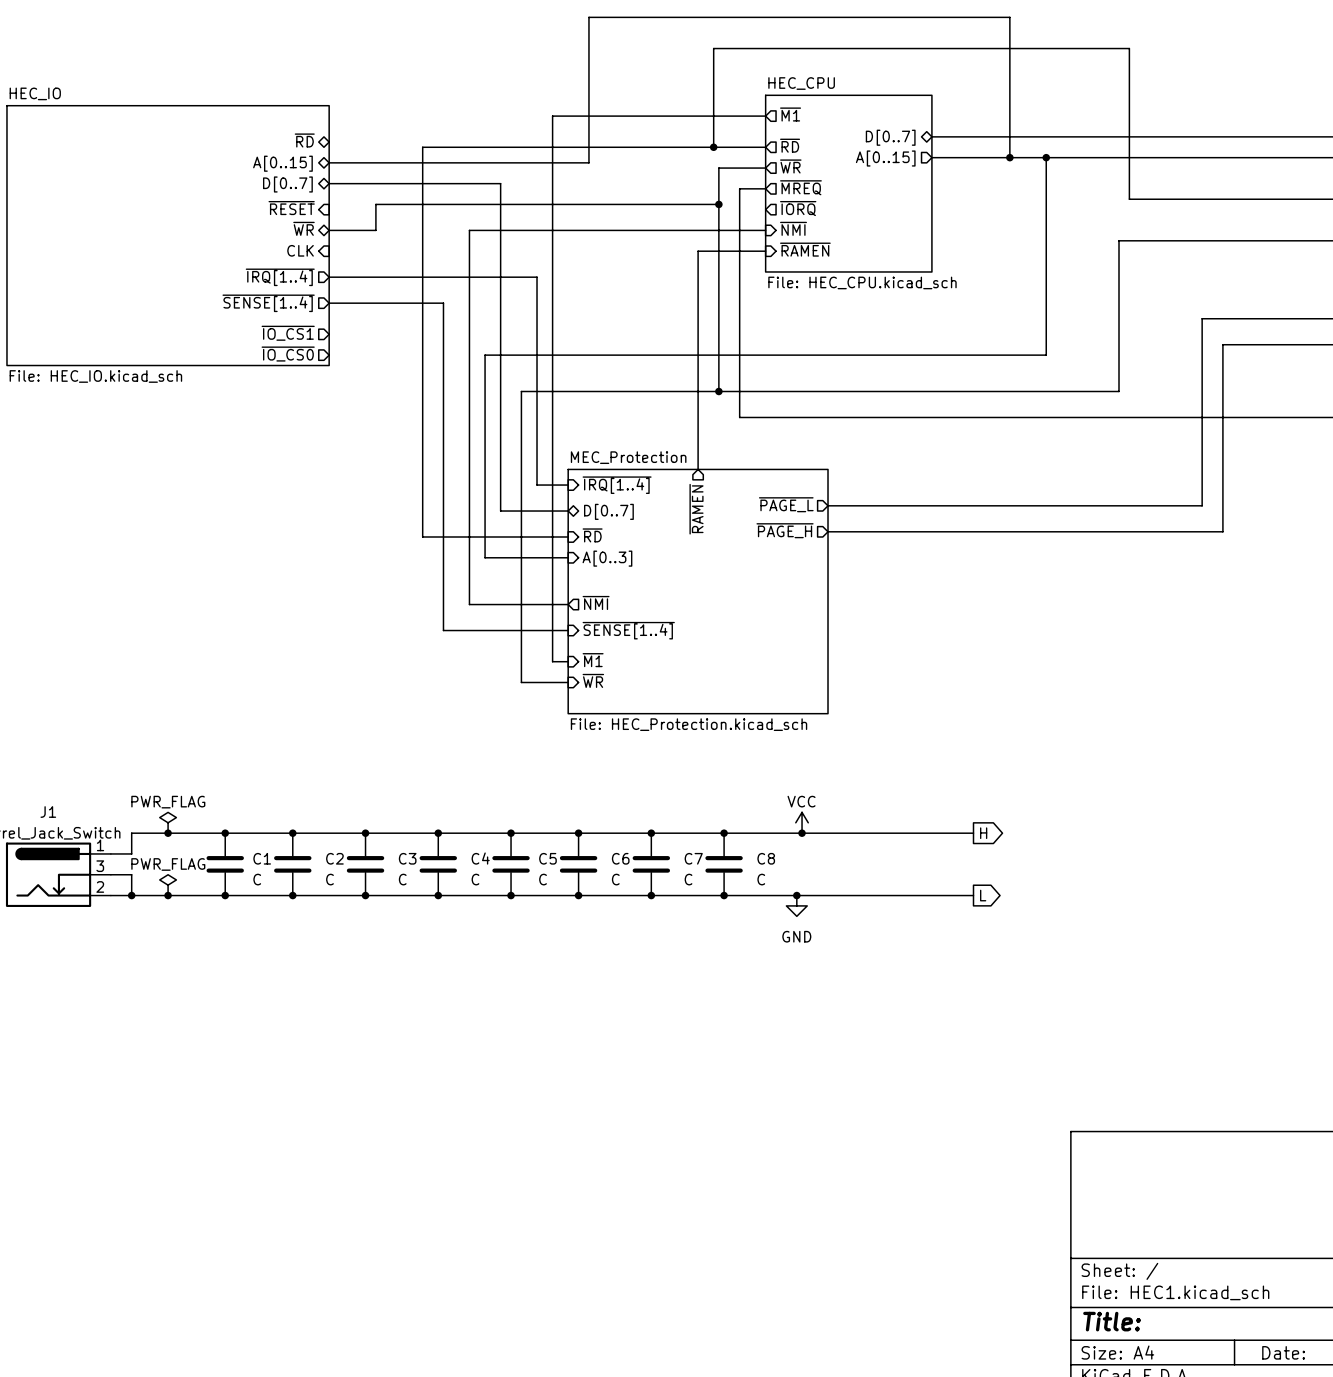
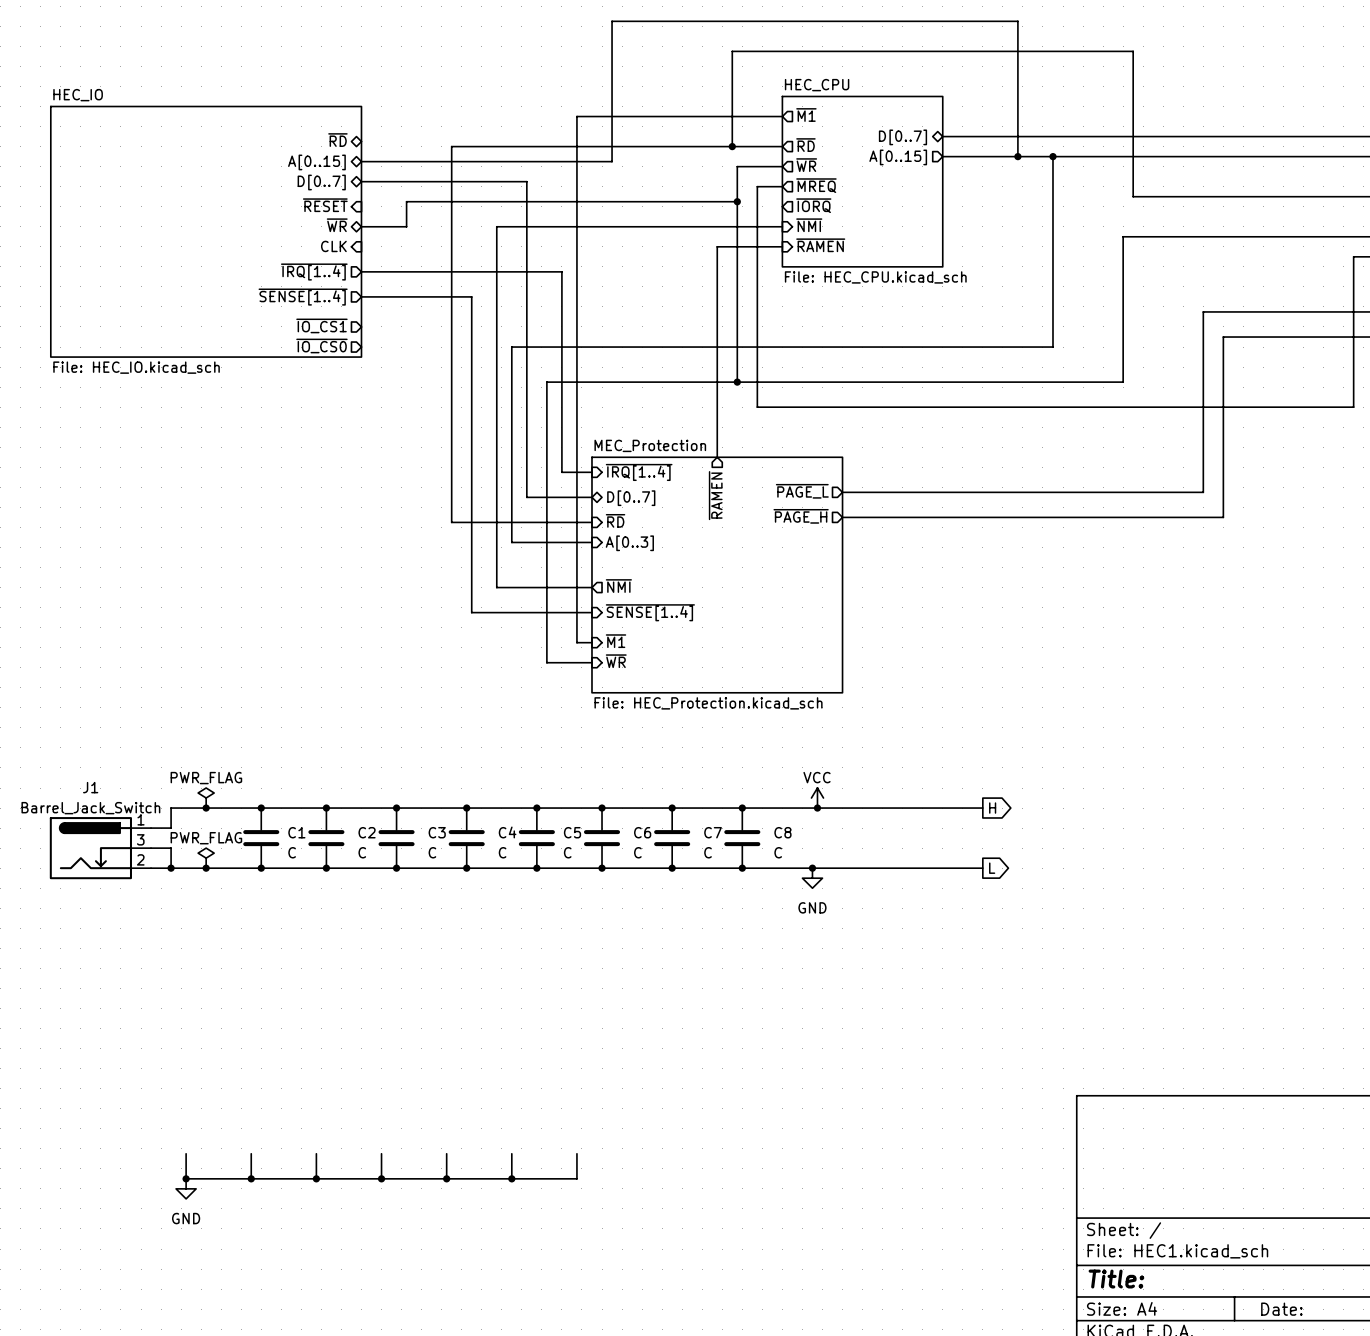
wire: none -> (186, 1153) (186, 1178) (576, 1178) (576, 1153)
wire: none -> (251, 1153) (251, 1178)
wire: none -> (316, 1153) (316, 1178)
wire: none -> (381, 1153) (381, 1178)
wire: none -> (446, 1153) (446, 1178)
wire: none -> (511, 1153) (511, 1178)
junction: none -> (186, 1178)
junction: none -> (251, 1178)
junction: none -> (316, 1178)
junction: none -> (381, 1178)
junction: none -> (446, 1178)
junction: none -> (511, 1178)
power symbol: none -> GND (186, 1188)

